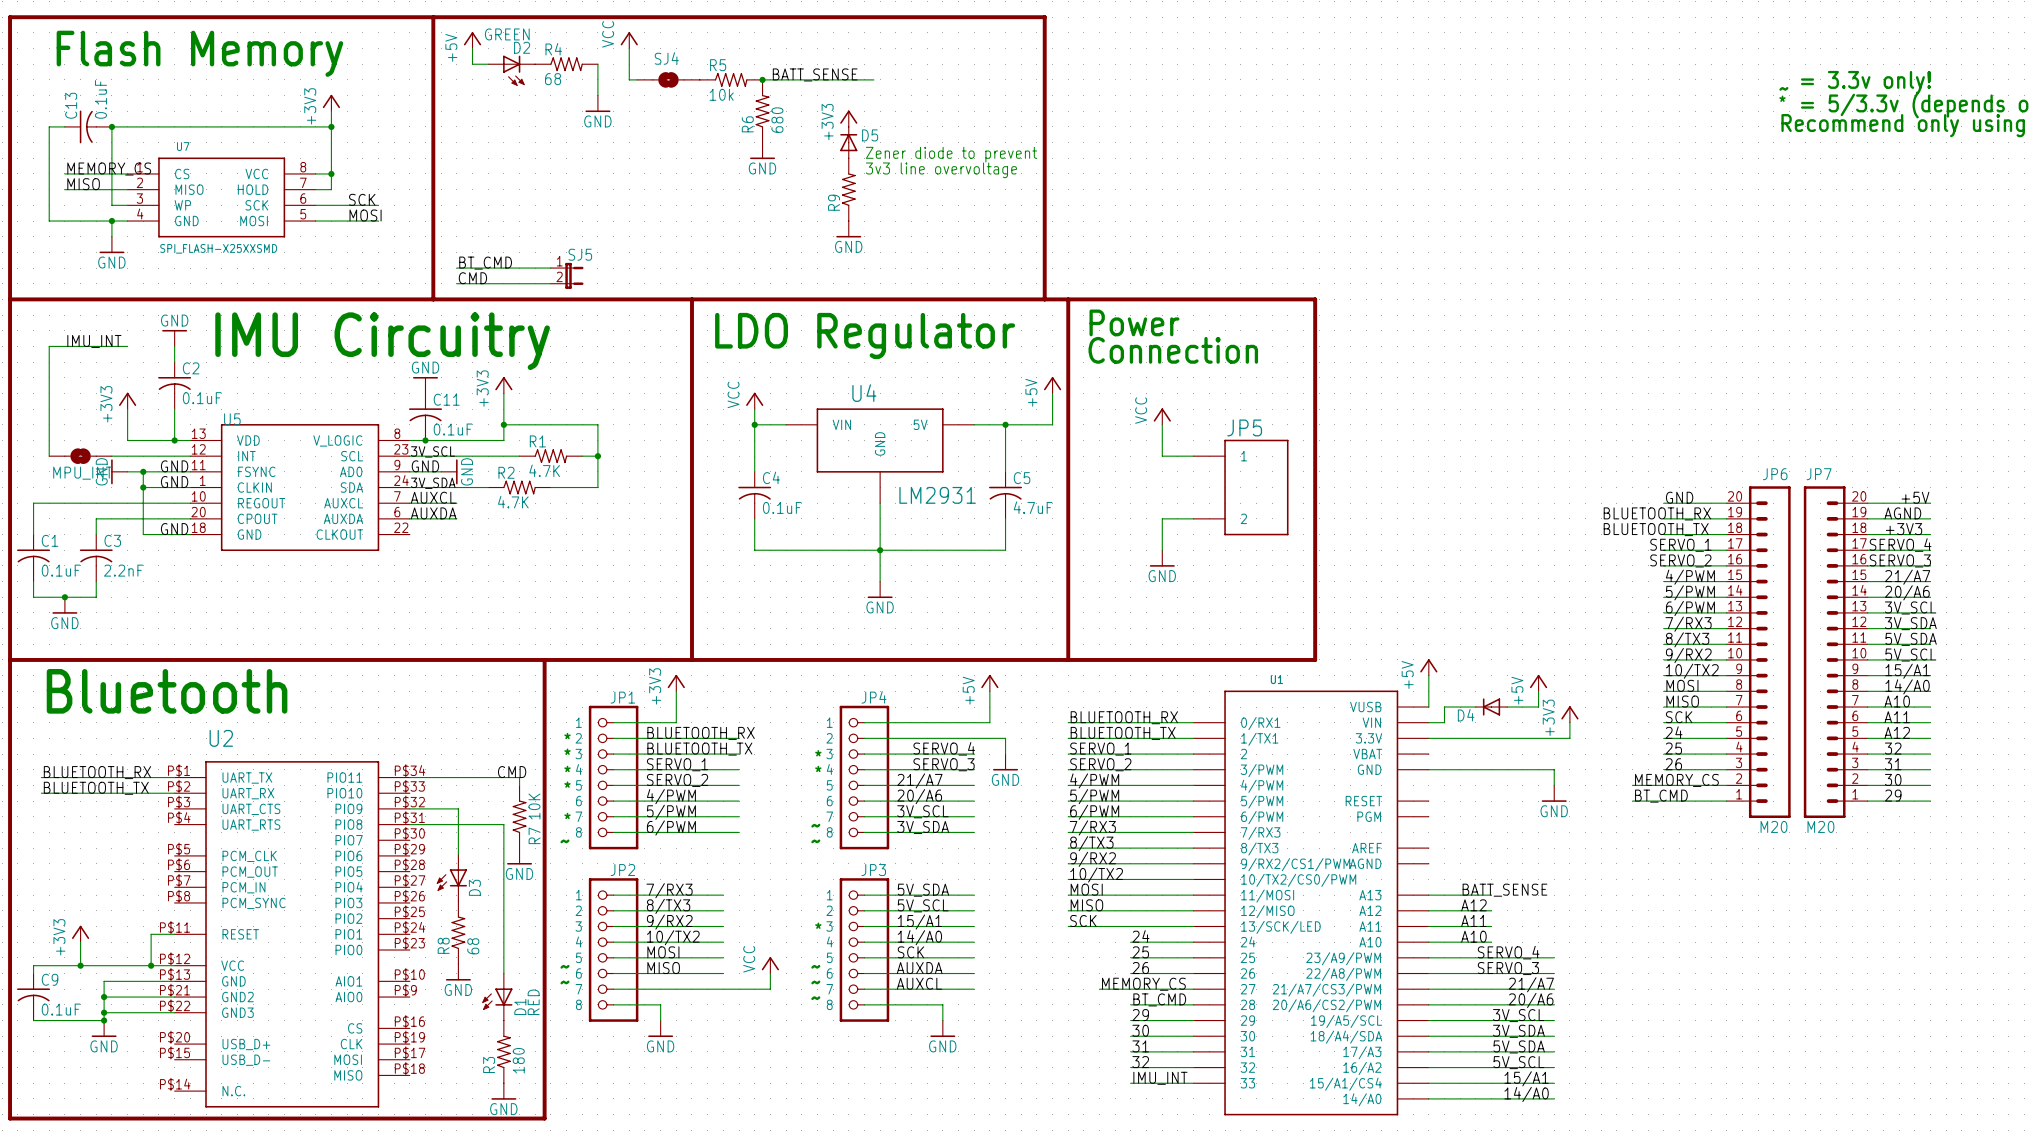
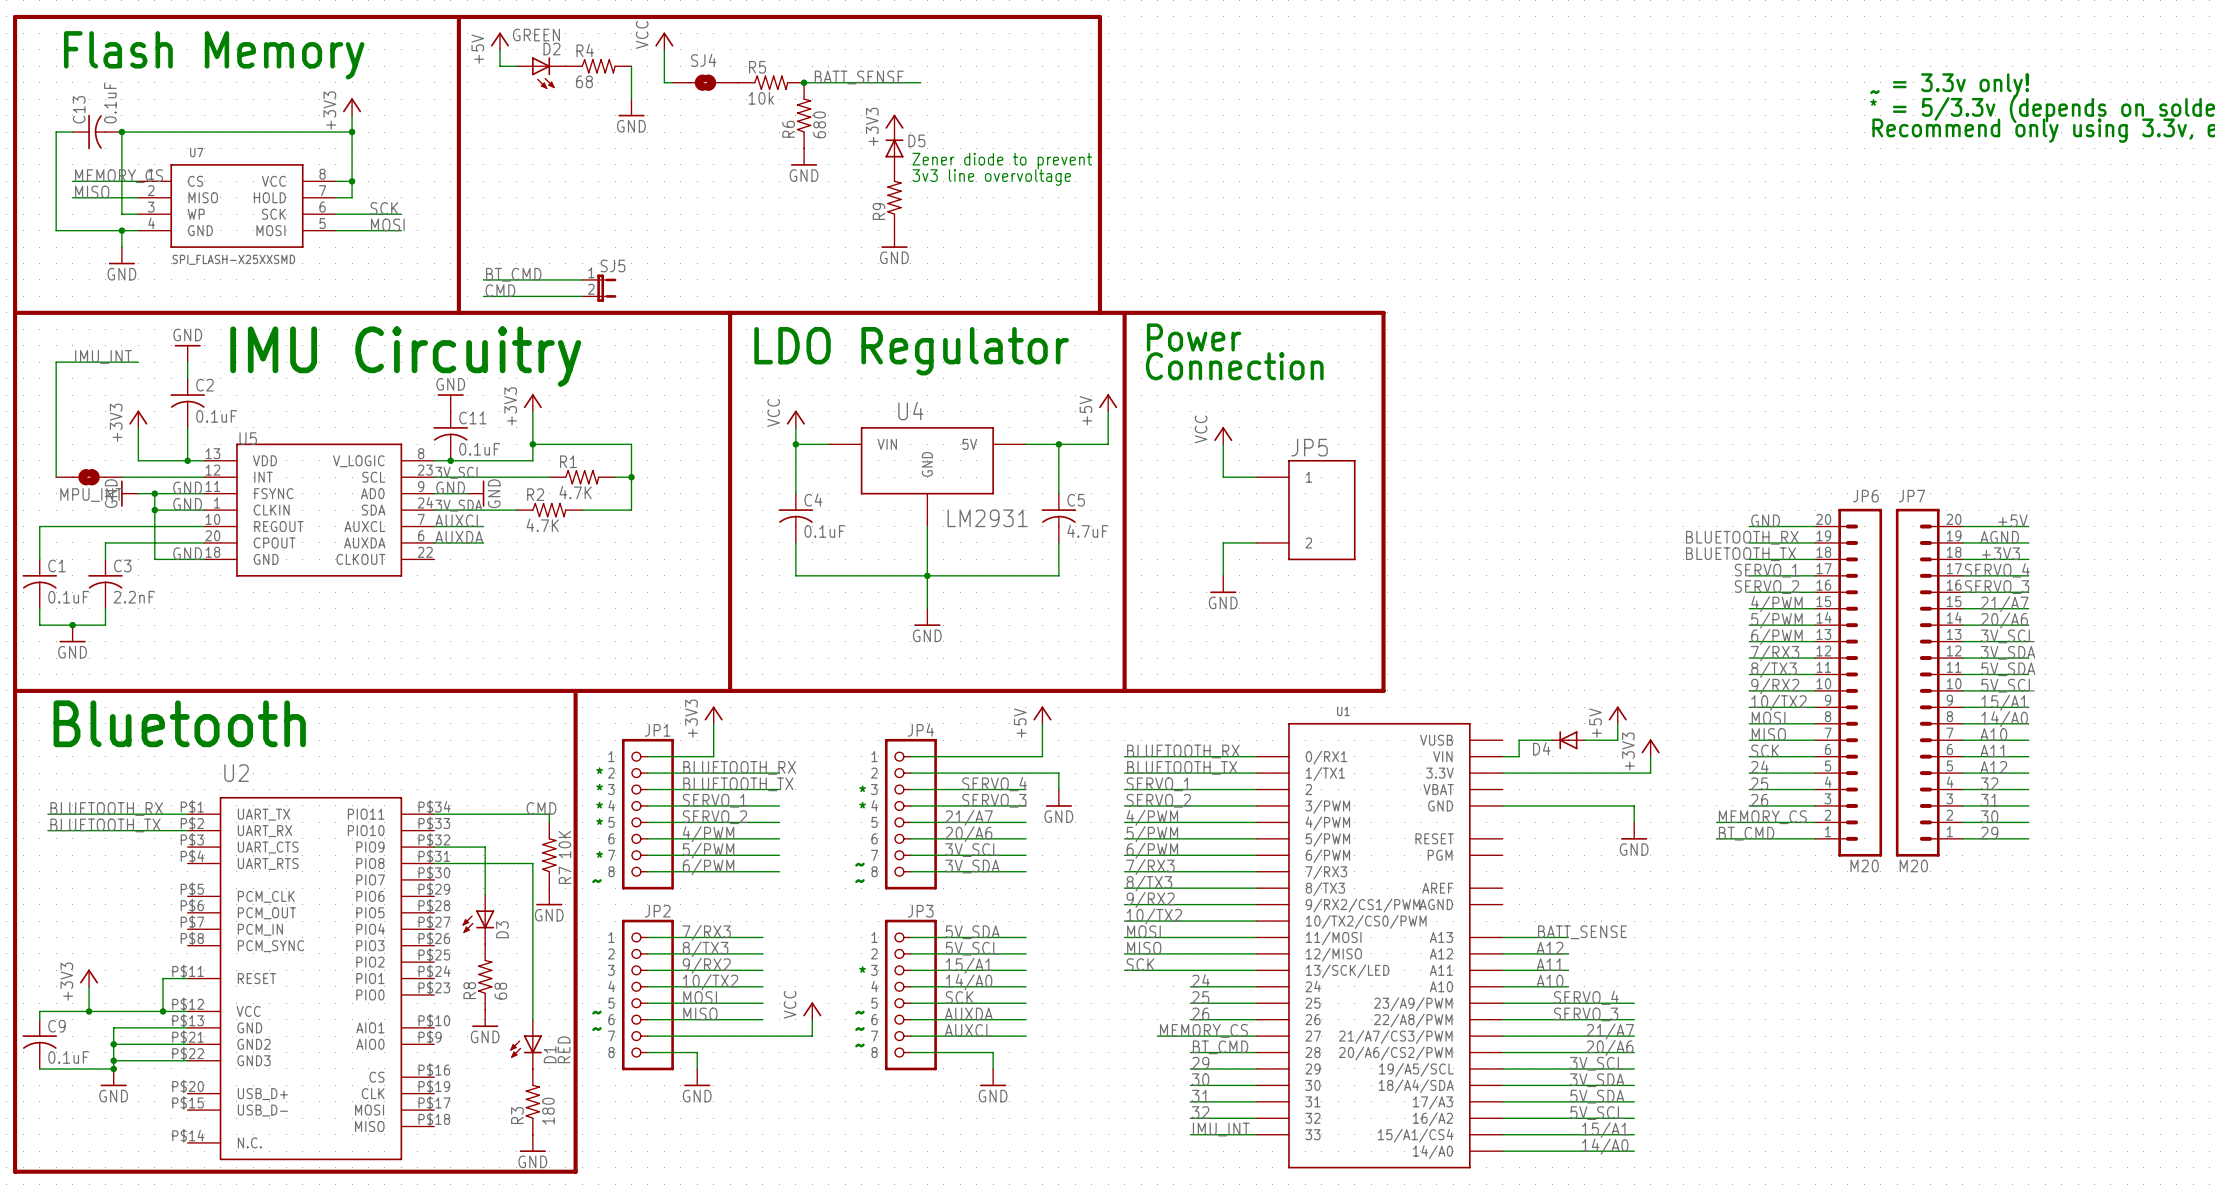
power symbol: +5V (1428, 667) -> none
wire: (1428, 675) (1428, 707) -> none

